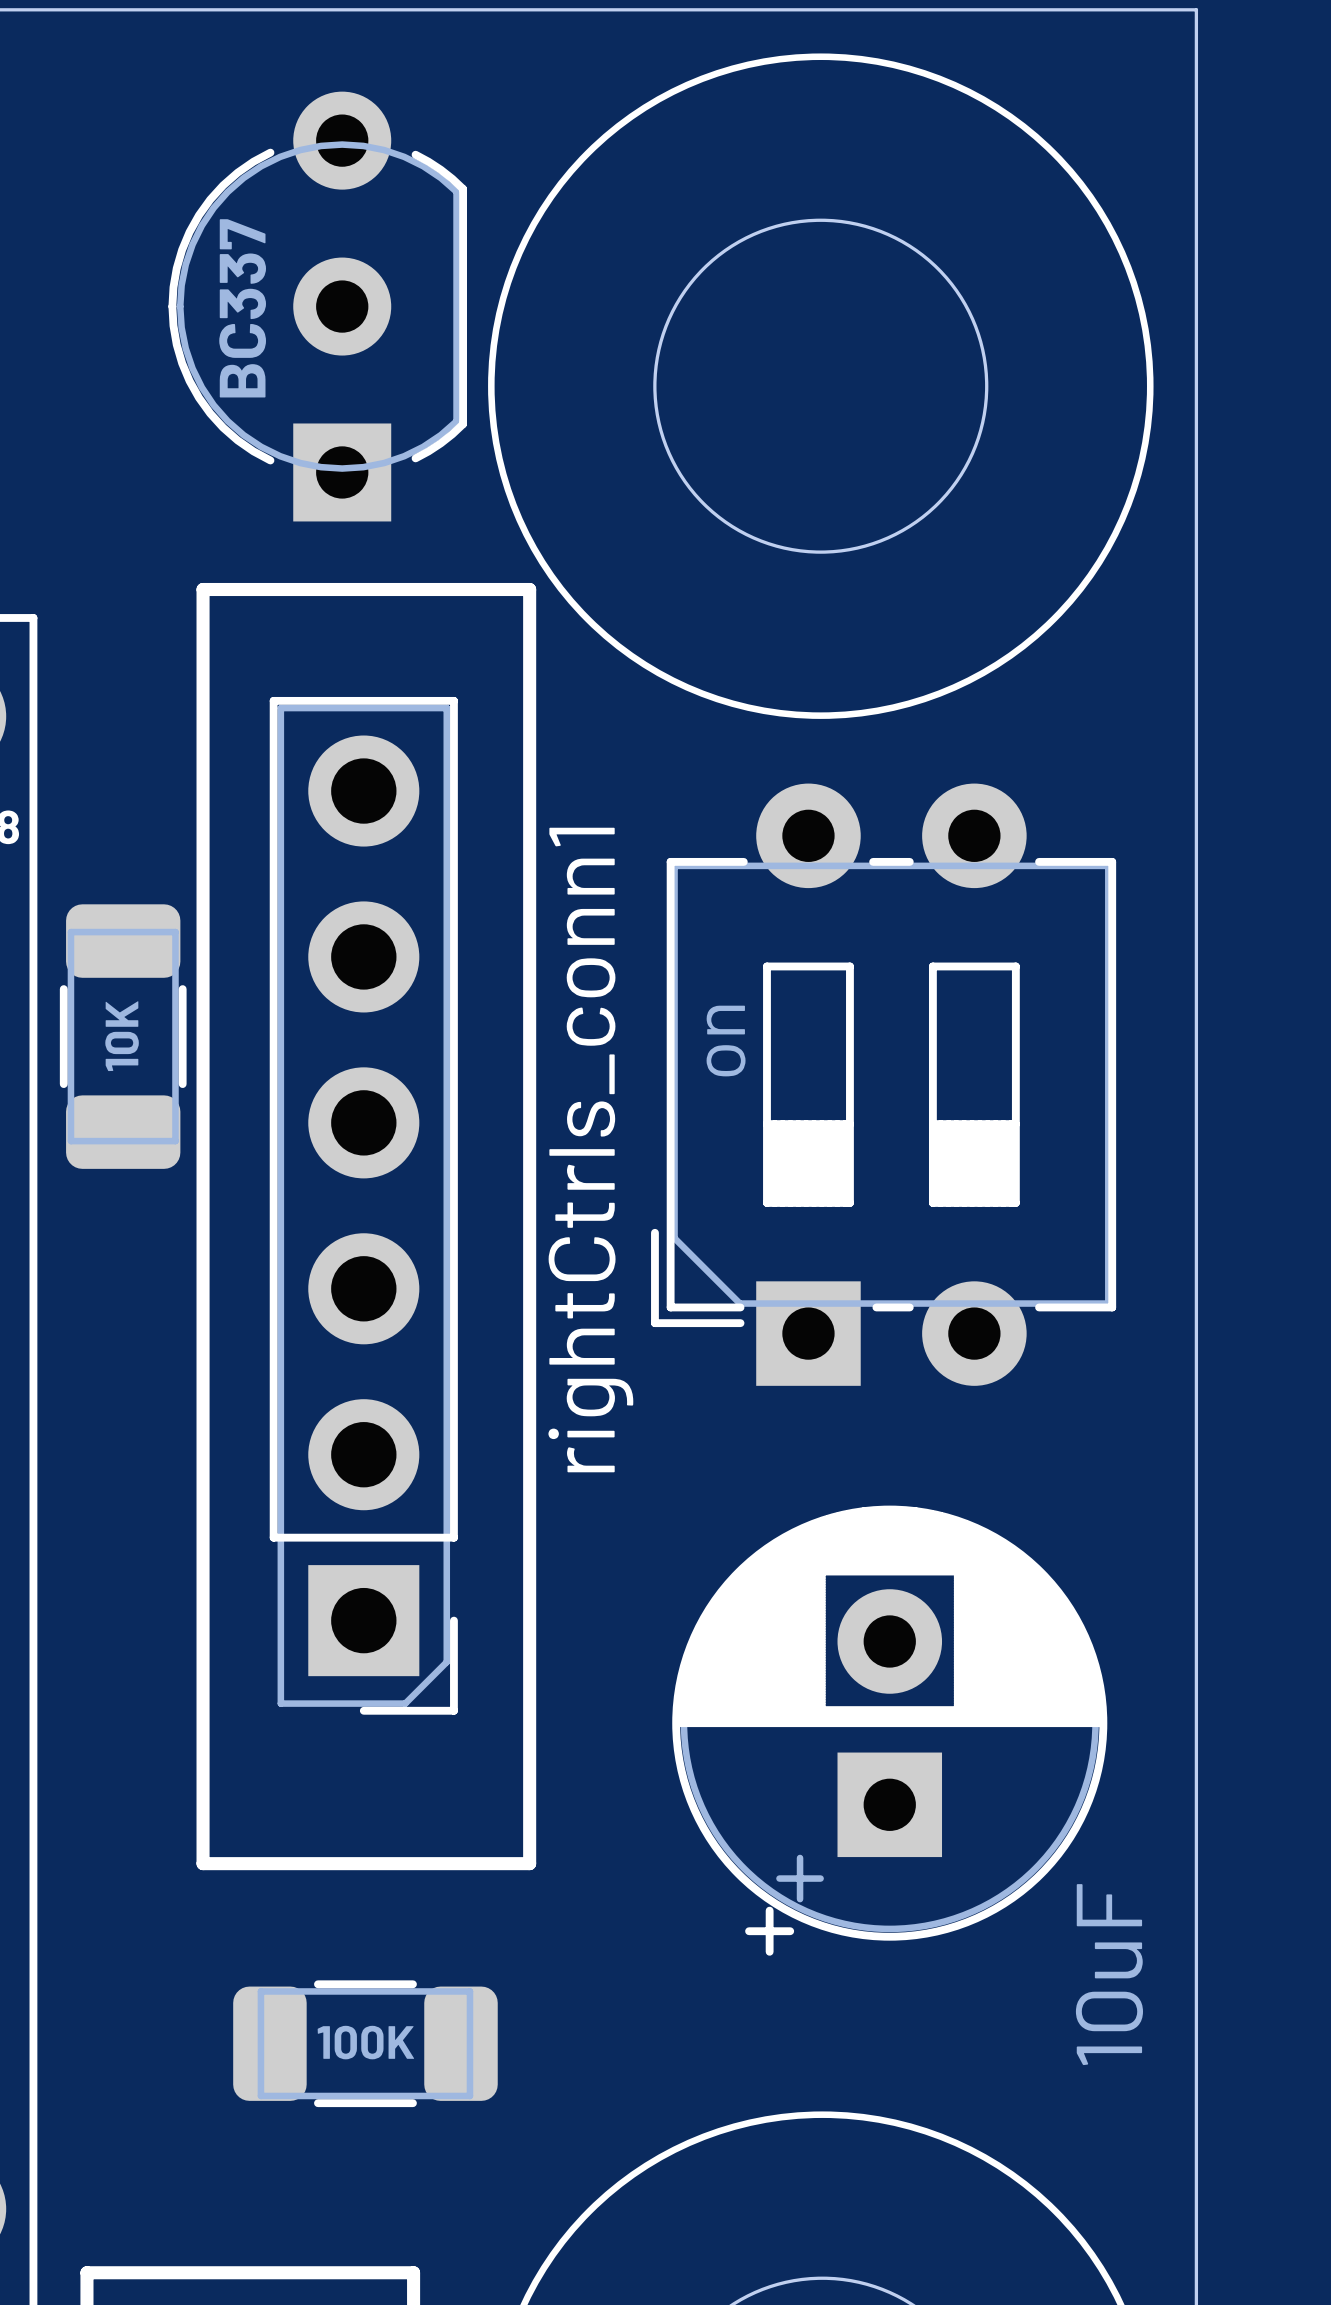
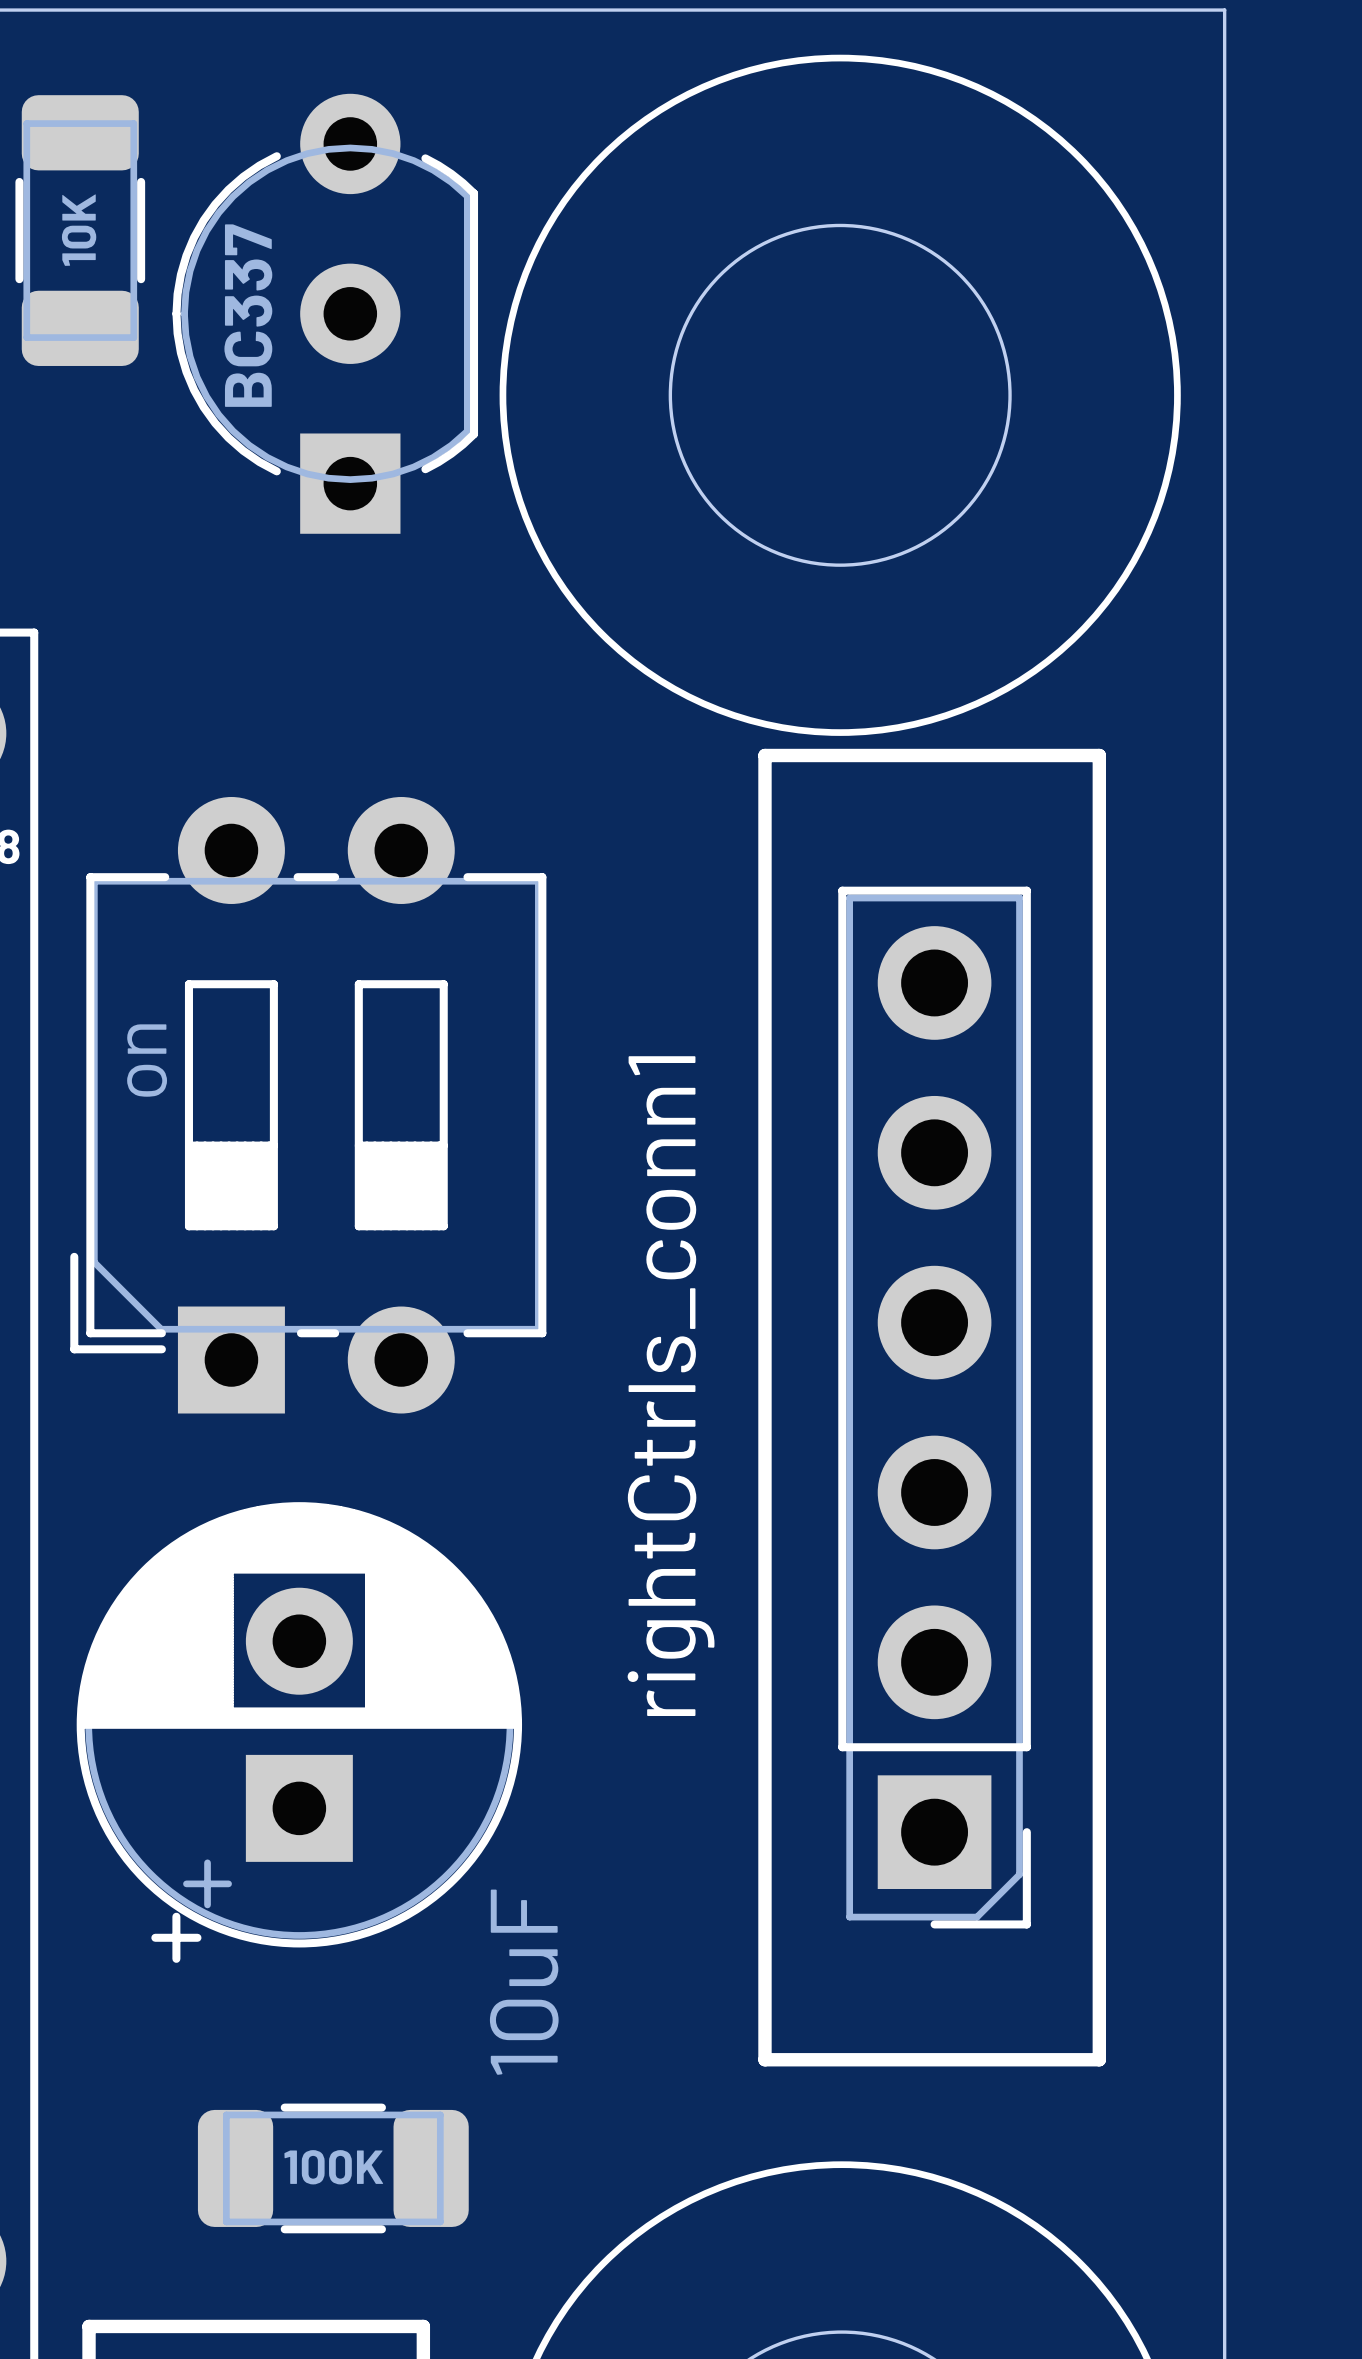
line: (203, 589) (529, 589) (529, 1863) (203, 1863) (203, 589) -> (764, 755) (1099, 755) (1099, 2059) (764, 2059) (764, 755)
part position: (123, 1036) -> (80, 230)
part position: (883, 1084) -> (308, 1105)
rightCtrls_conn1 name position: rightCtrls_conn1 (590, 1150) -> rightCtrls_conn1 (671, 1386)
rightCtrls_conn1 position: (363, 1205) -> (934, 1407)
part position: (889, 1730) -> (299, 1732)
part position: (365, 2043) -> (333, 2168)

